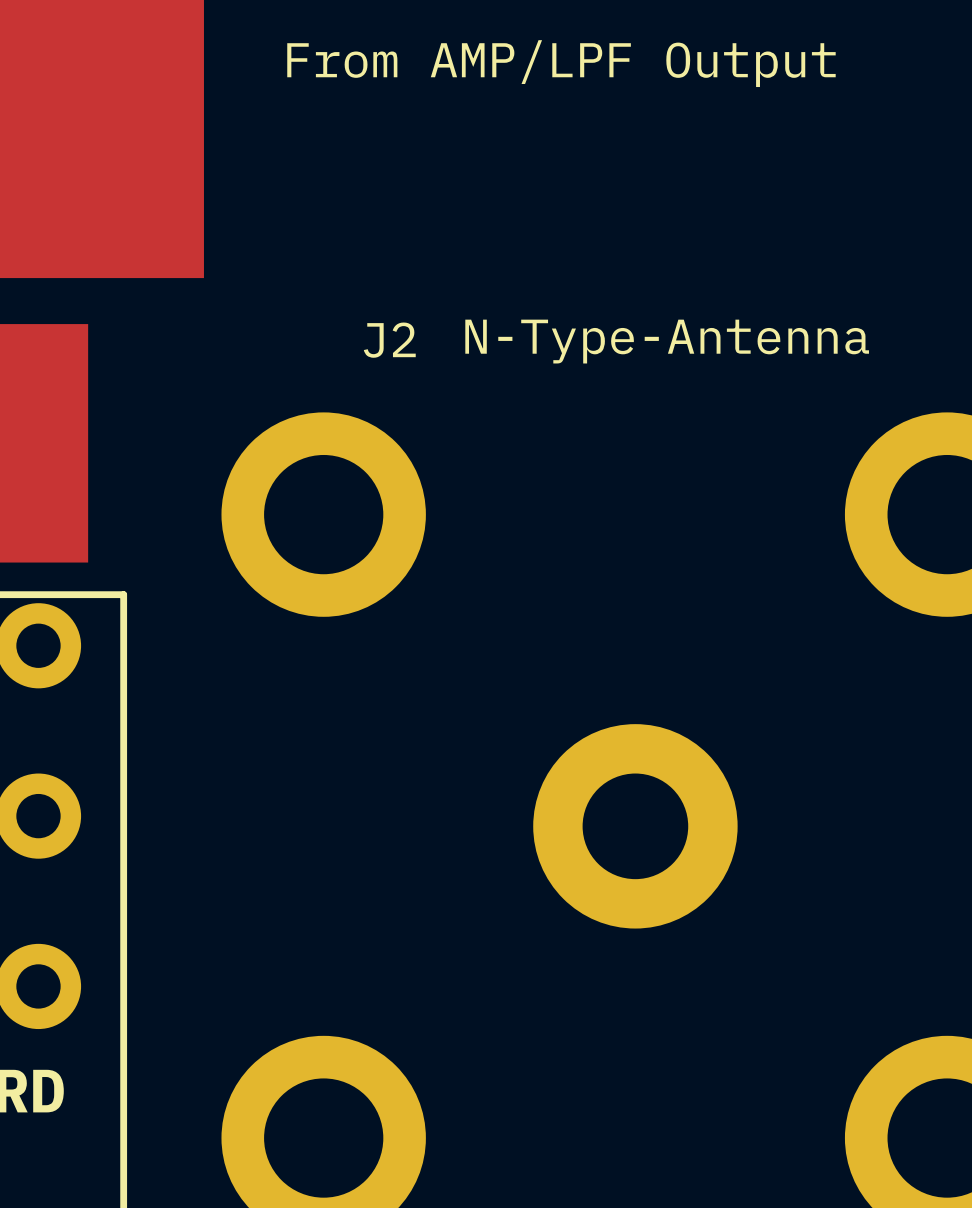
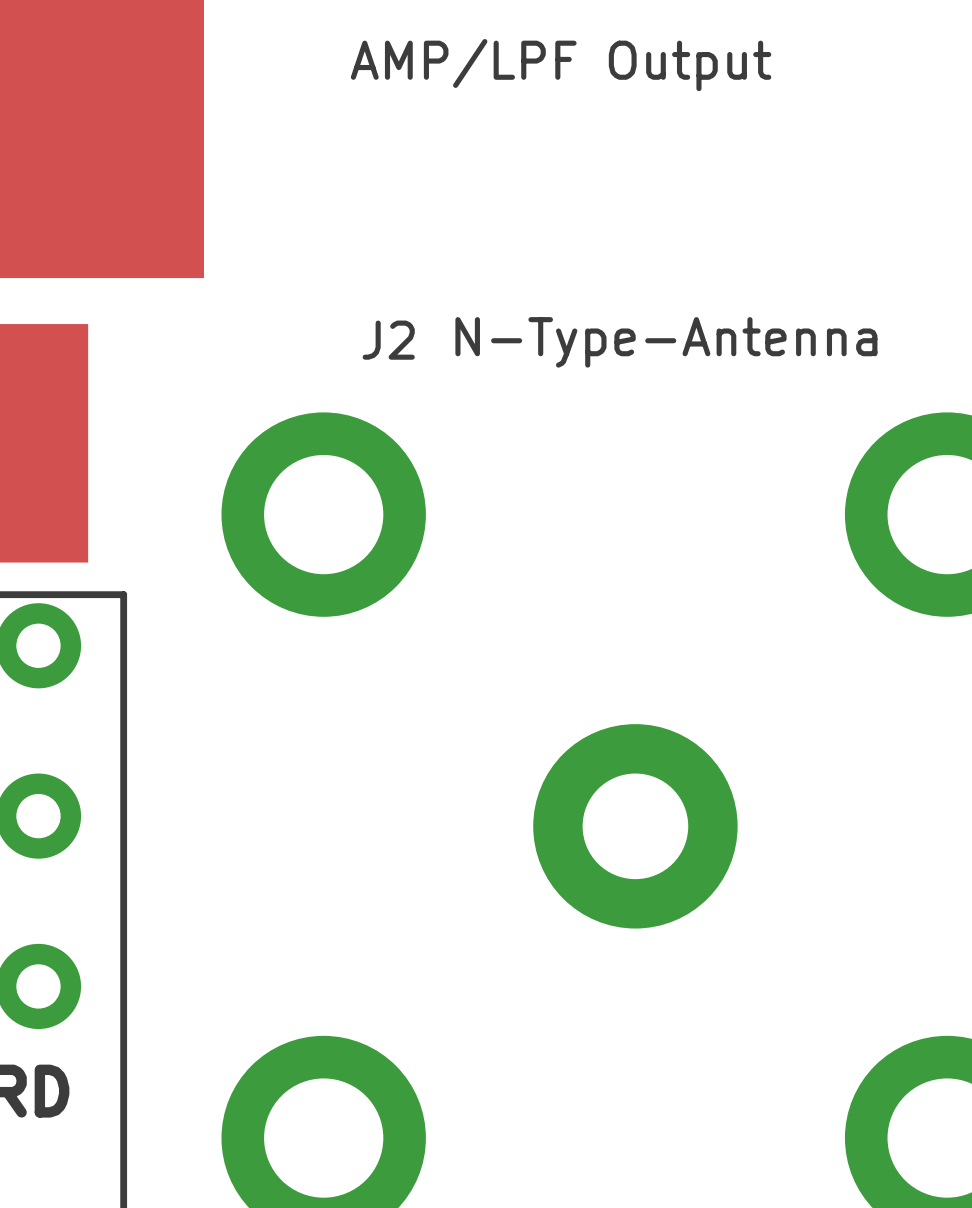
part value: From AMP/LPF Output (561, 63) -> AMP/LPF Output (561, 65)

